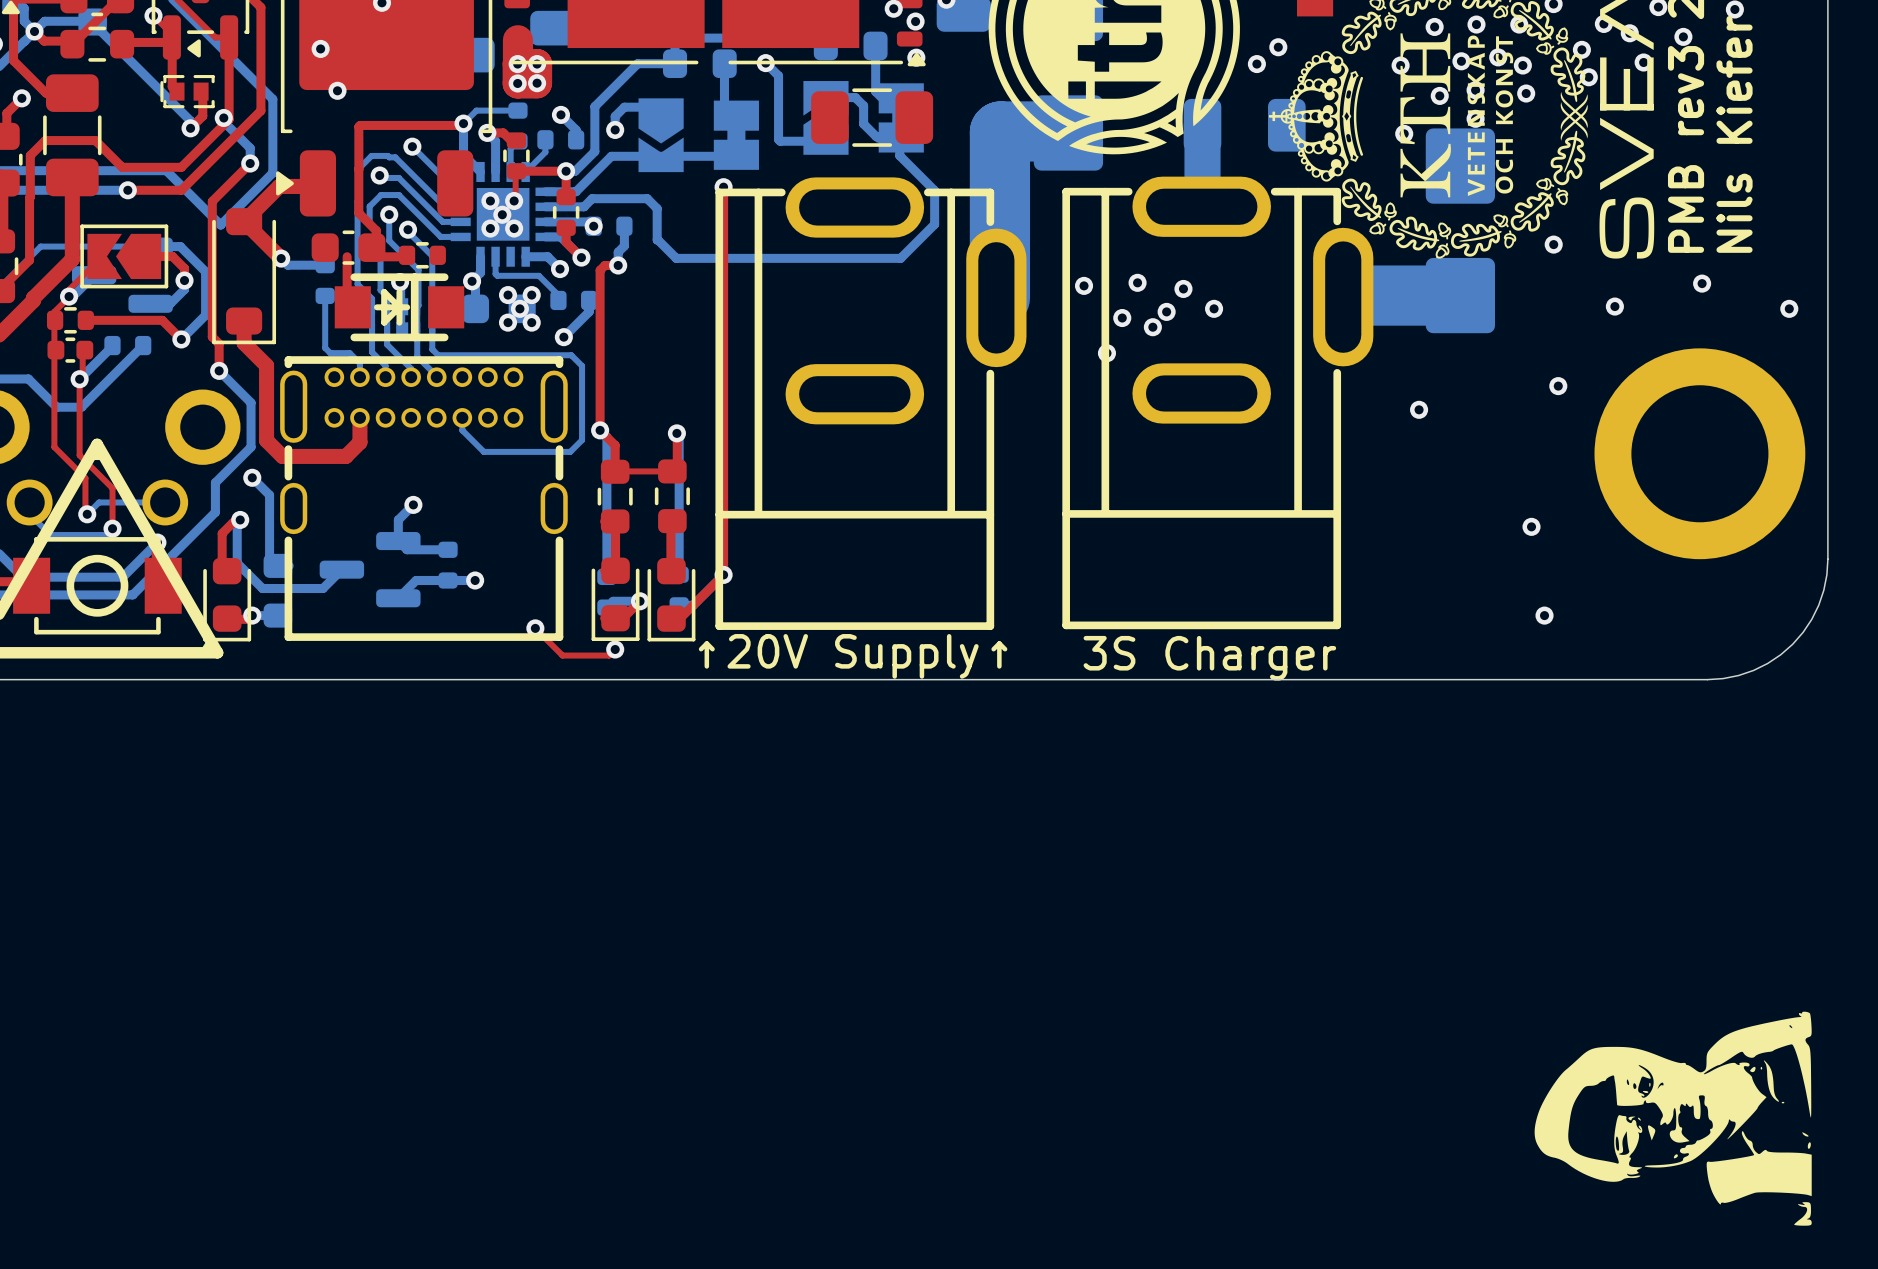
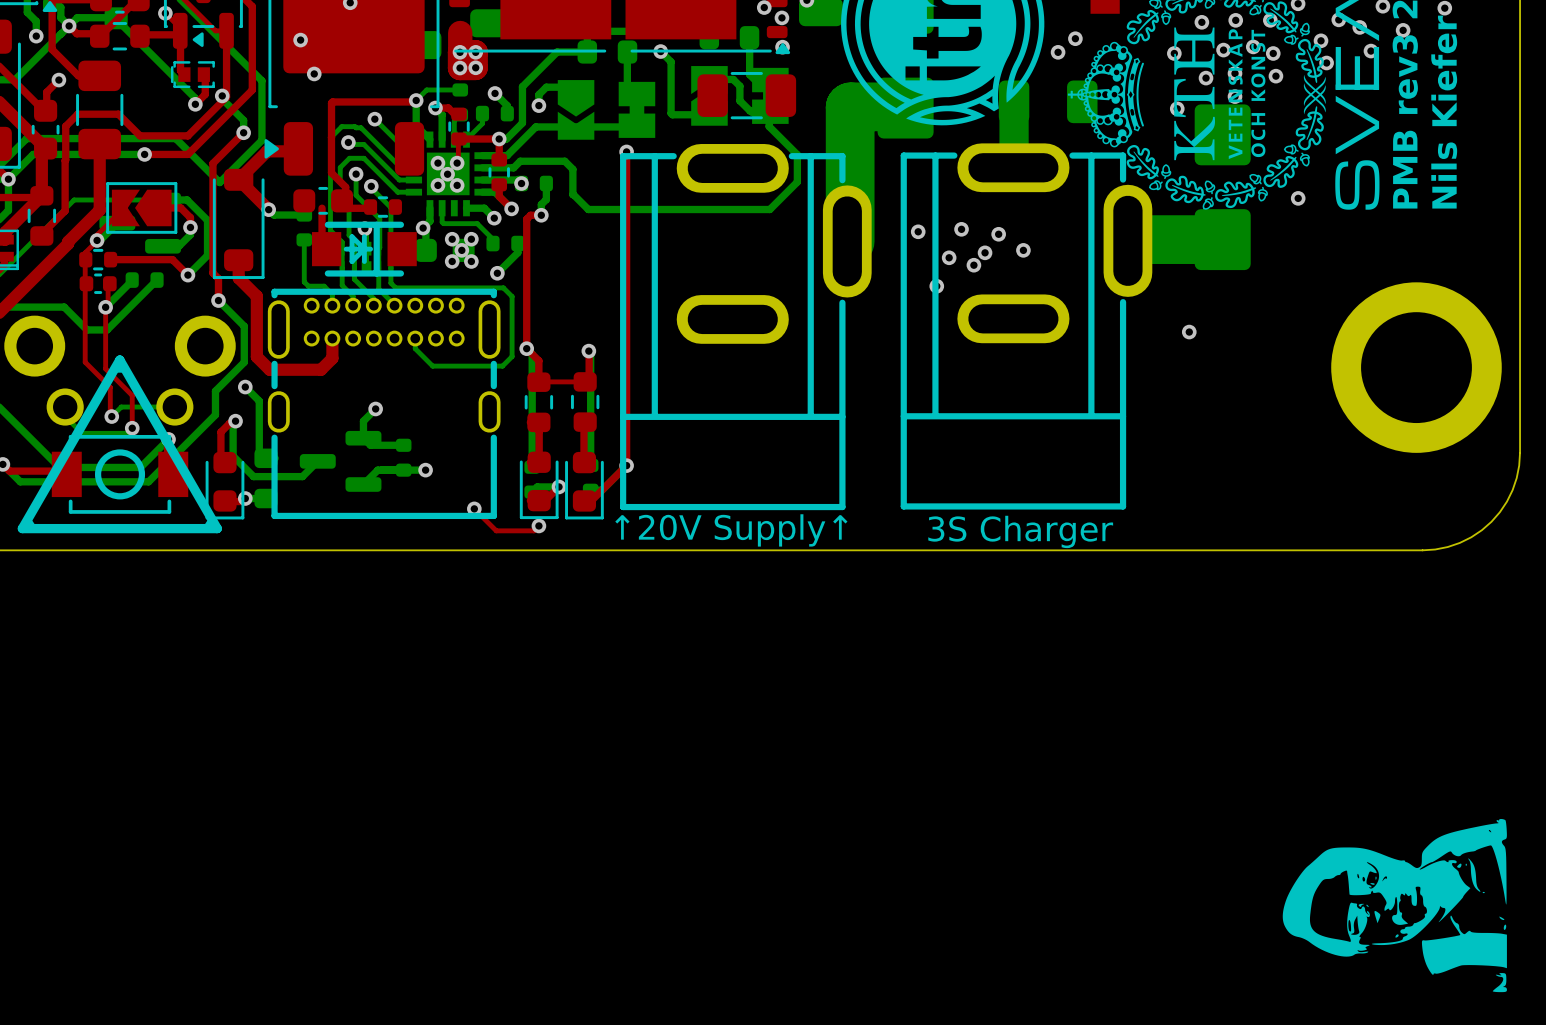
via: (1702, 283) -> none
via: (1614, 306) -> none
via: (1789, 308) -> none
via: (1558, 386) -> none
via: (1531, 526) -> none
via: (1544, 615) -> none

